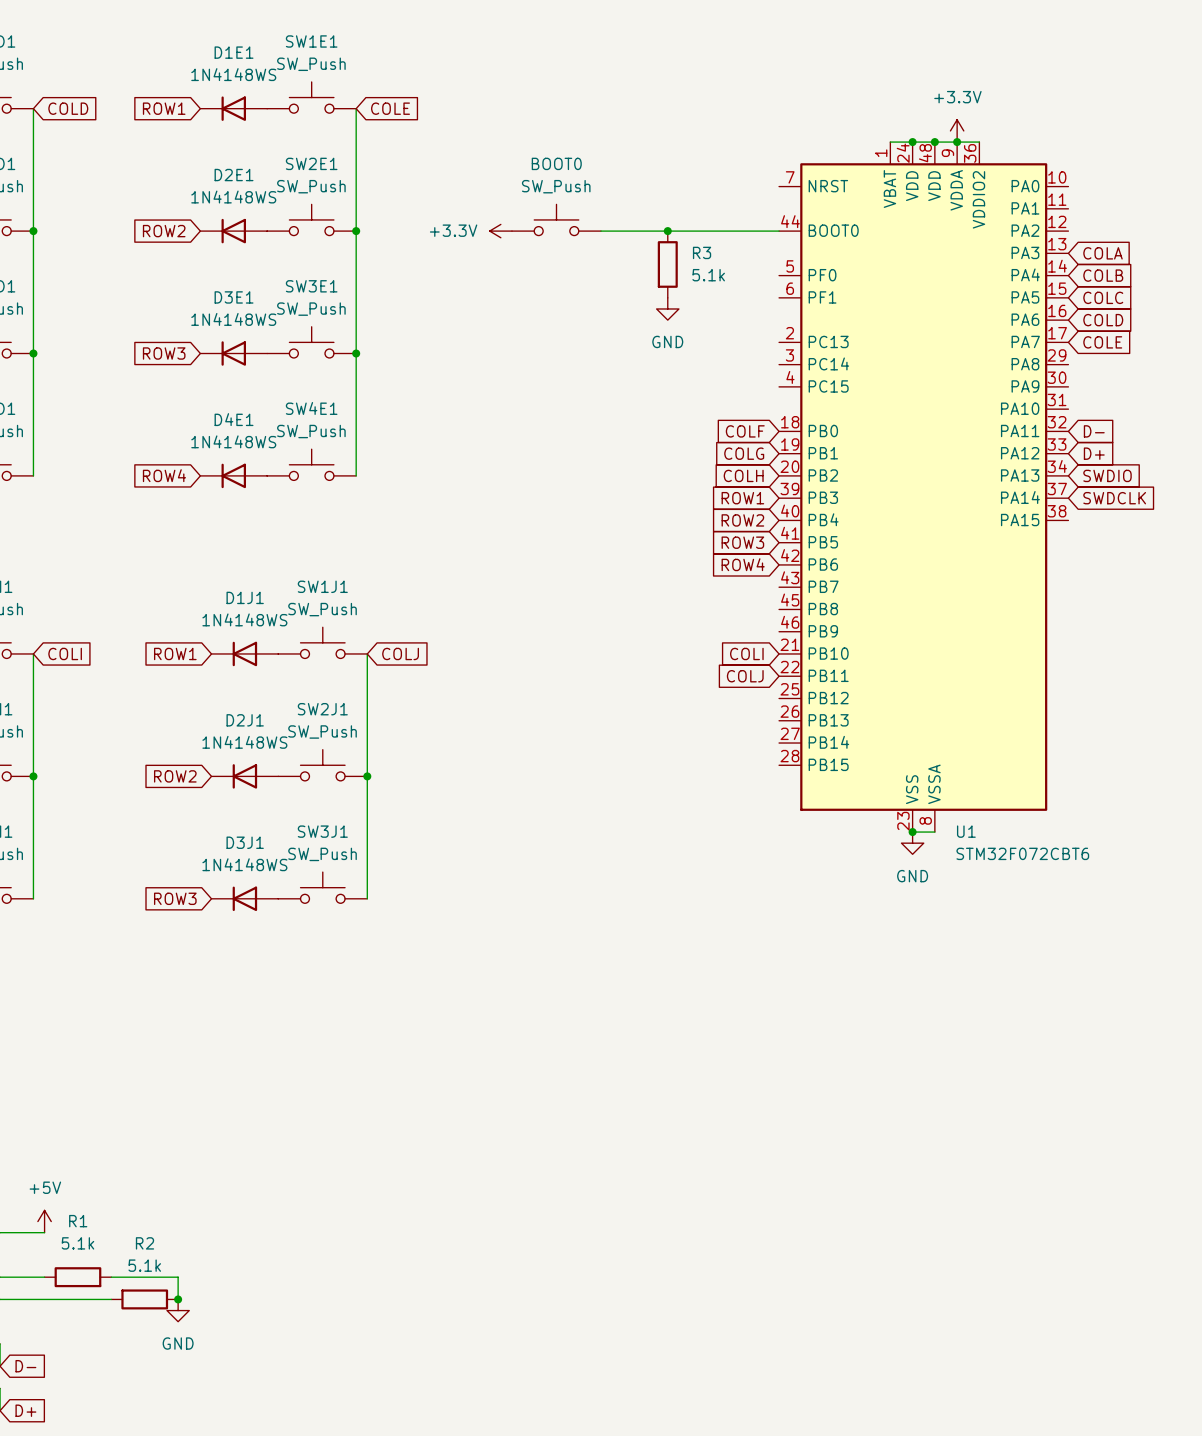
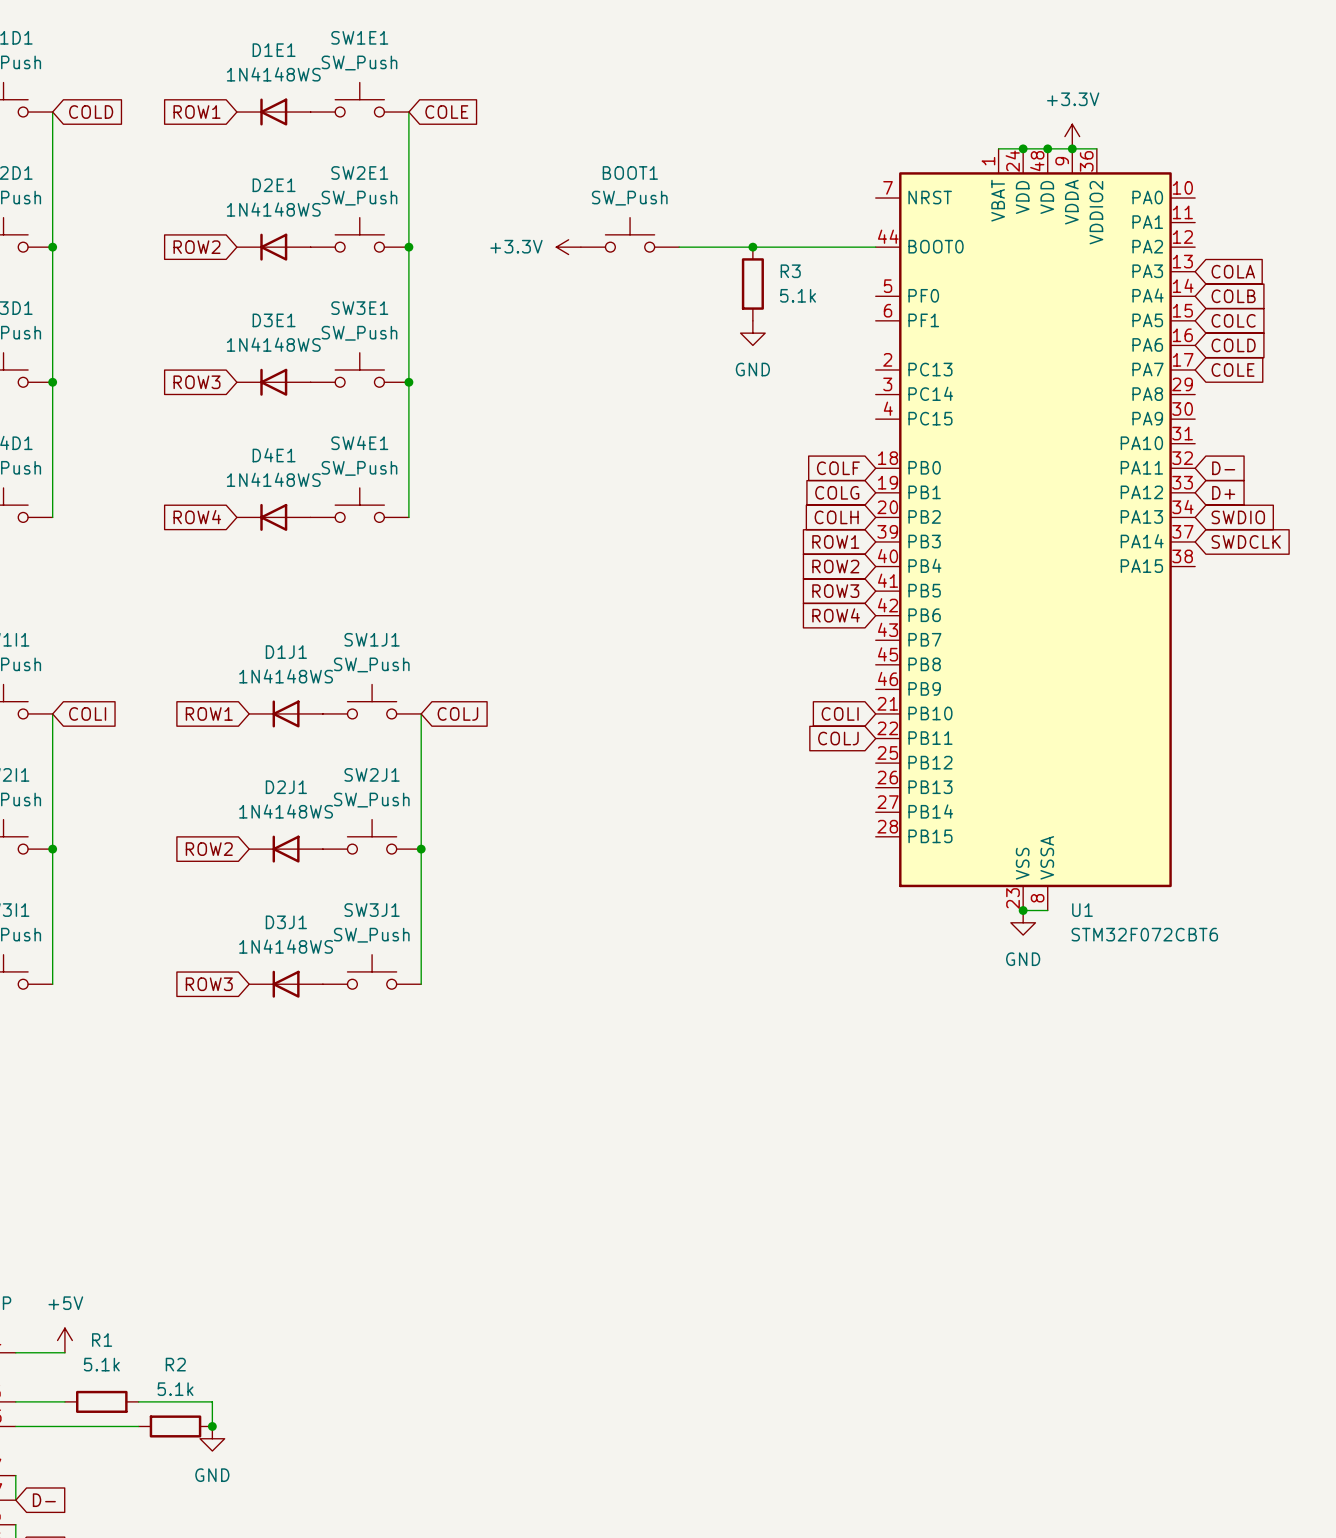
BOOT0 name: BOOT0 (556, 163) -> BOOT1 (630, 172)

